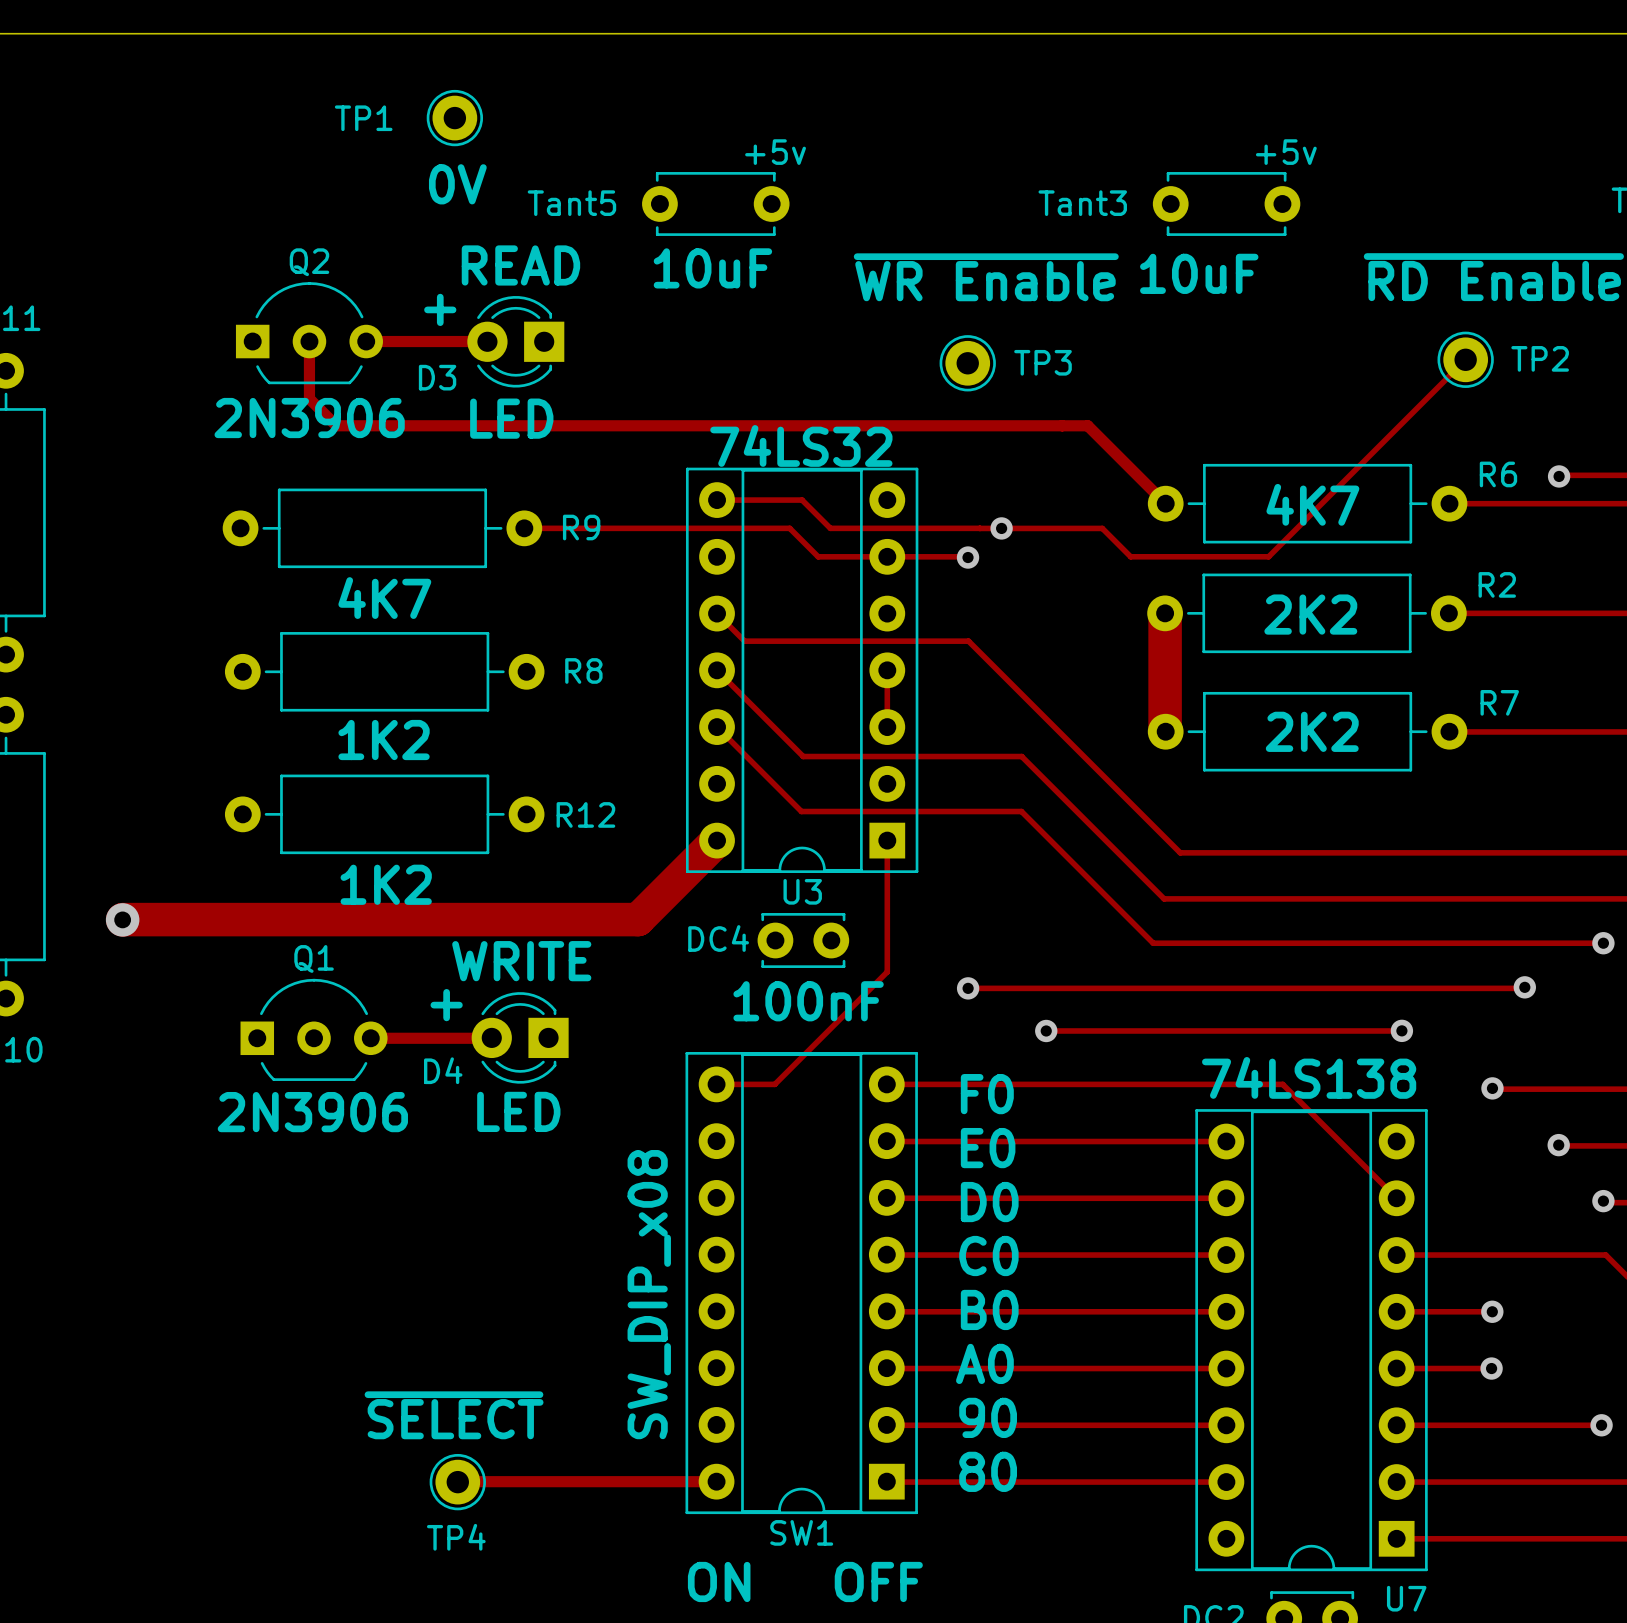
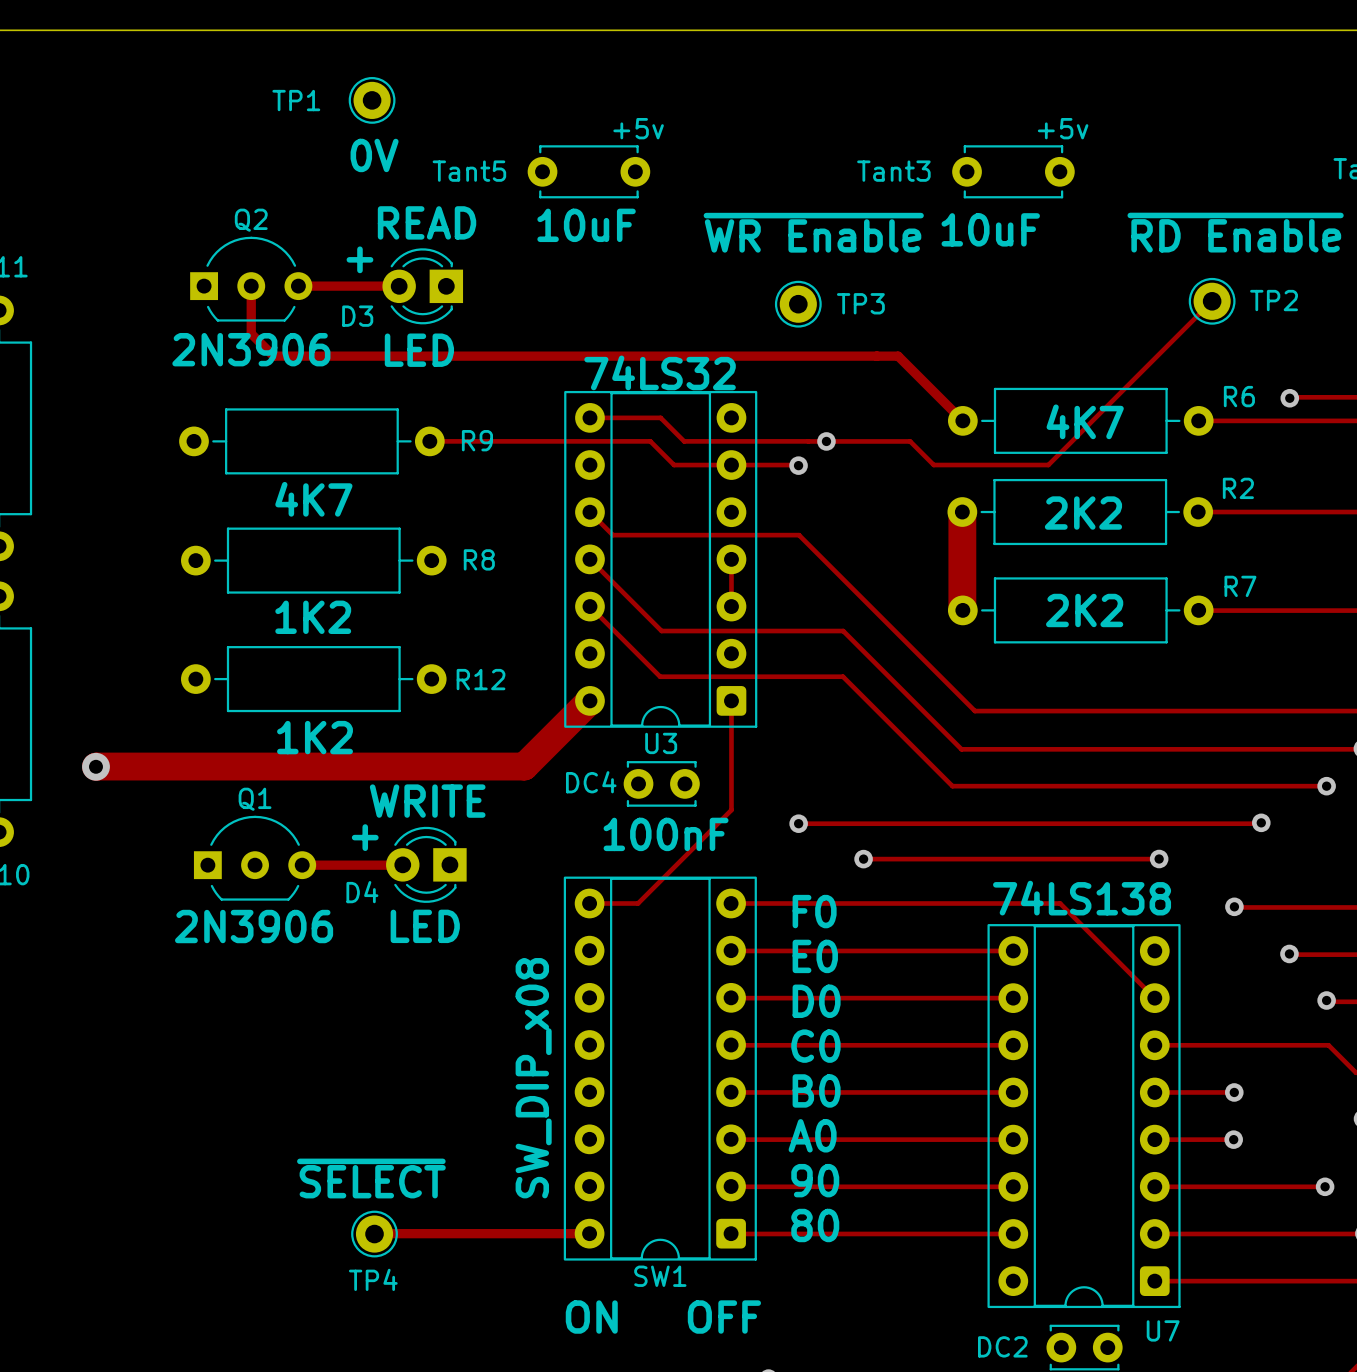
U3 footprint: [685, 467, 919, 874] -> [564, 390, 758, 728]
SW1 footprint: [685, 1051, 918, 1515] -> [563, 876, 757, 1261]
U7 footprint: [1195, 1109, 1428, 1572] -> [987, 924, 1181, 1309]

